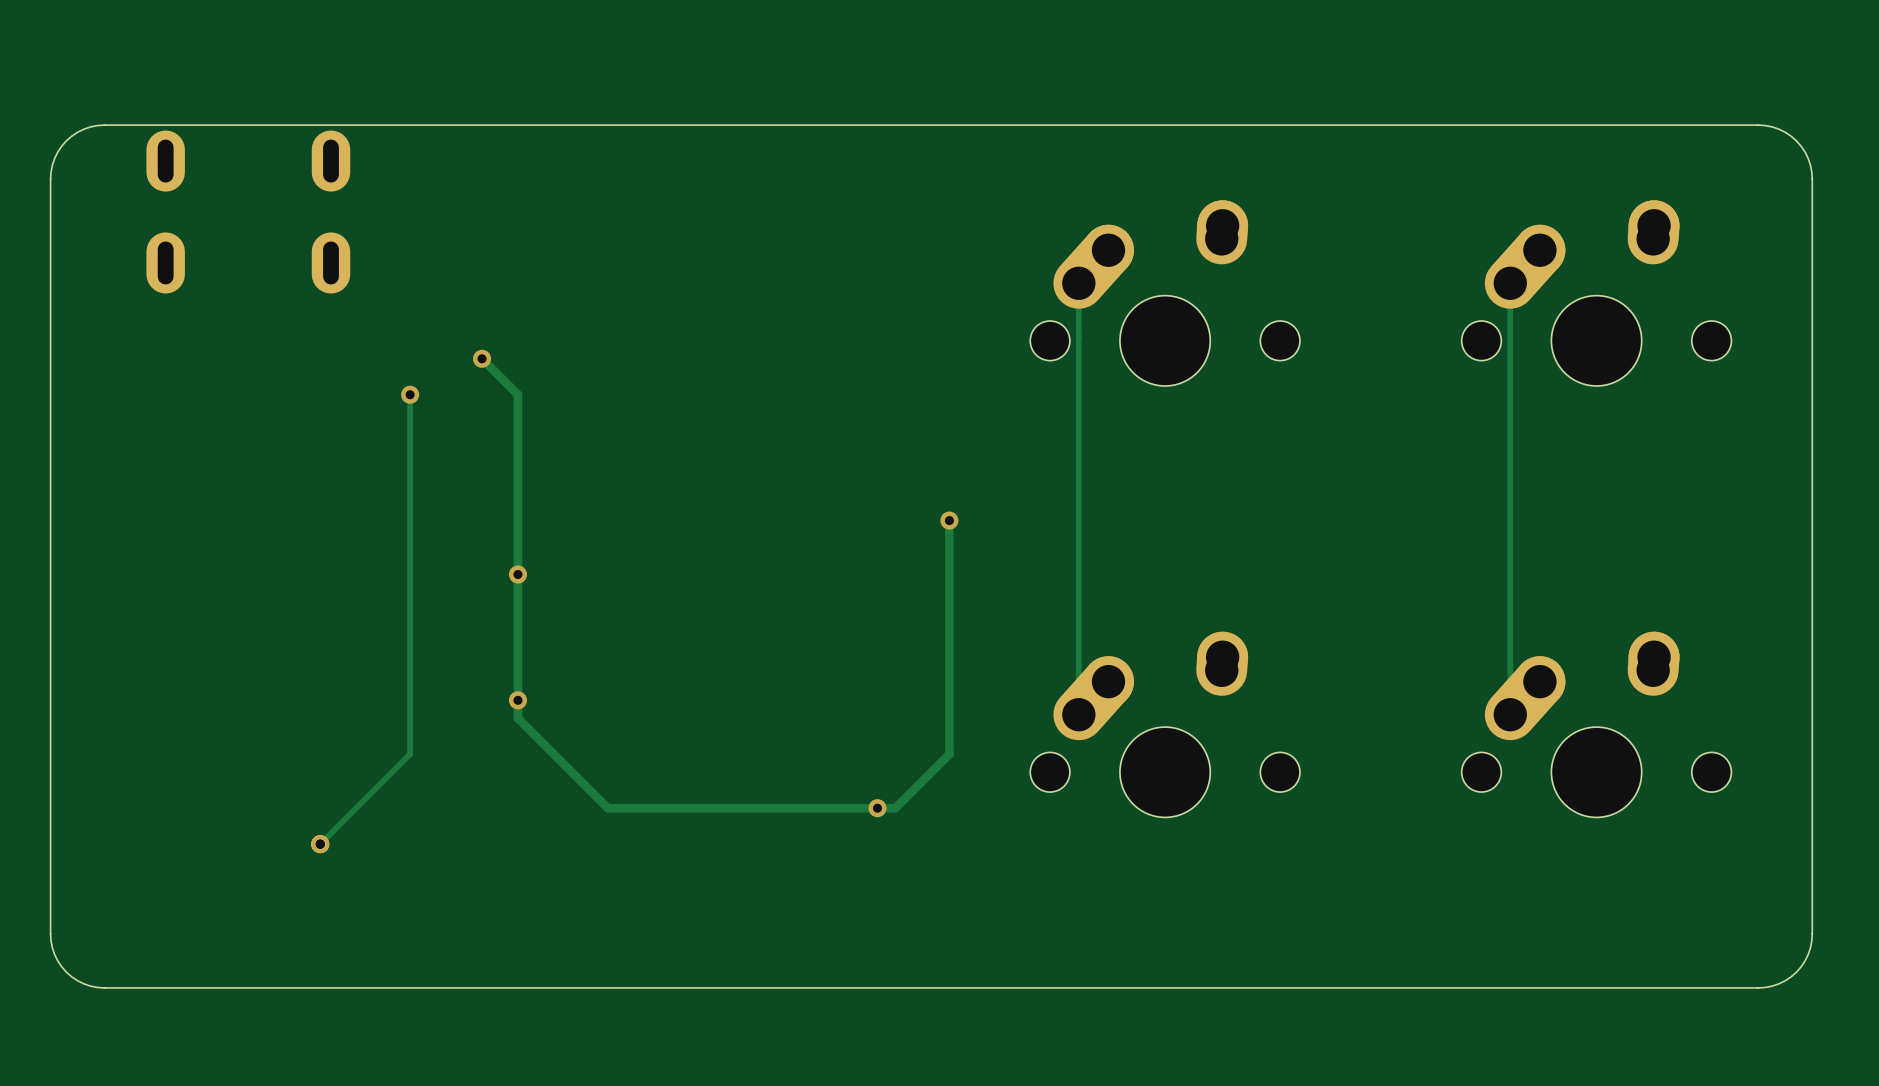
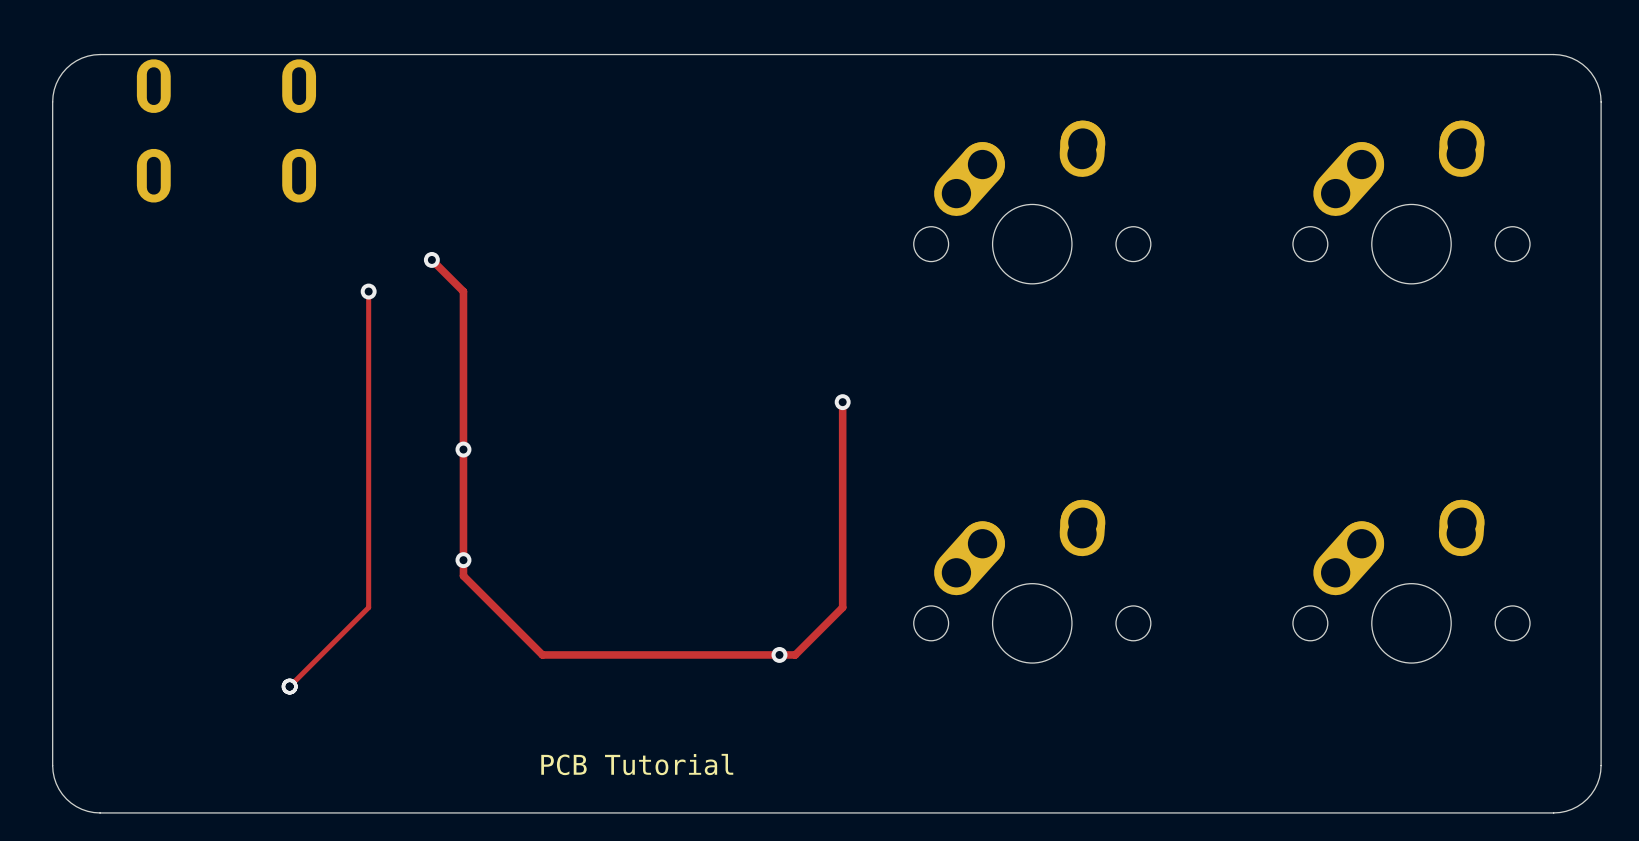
track: (1078, 283) (1078, 714) -> none
track: (1510, 283) (1510, 714) -> none
text: none -> PCB Tutorial (637, 764)

